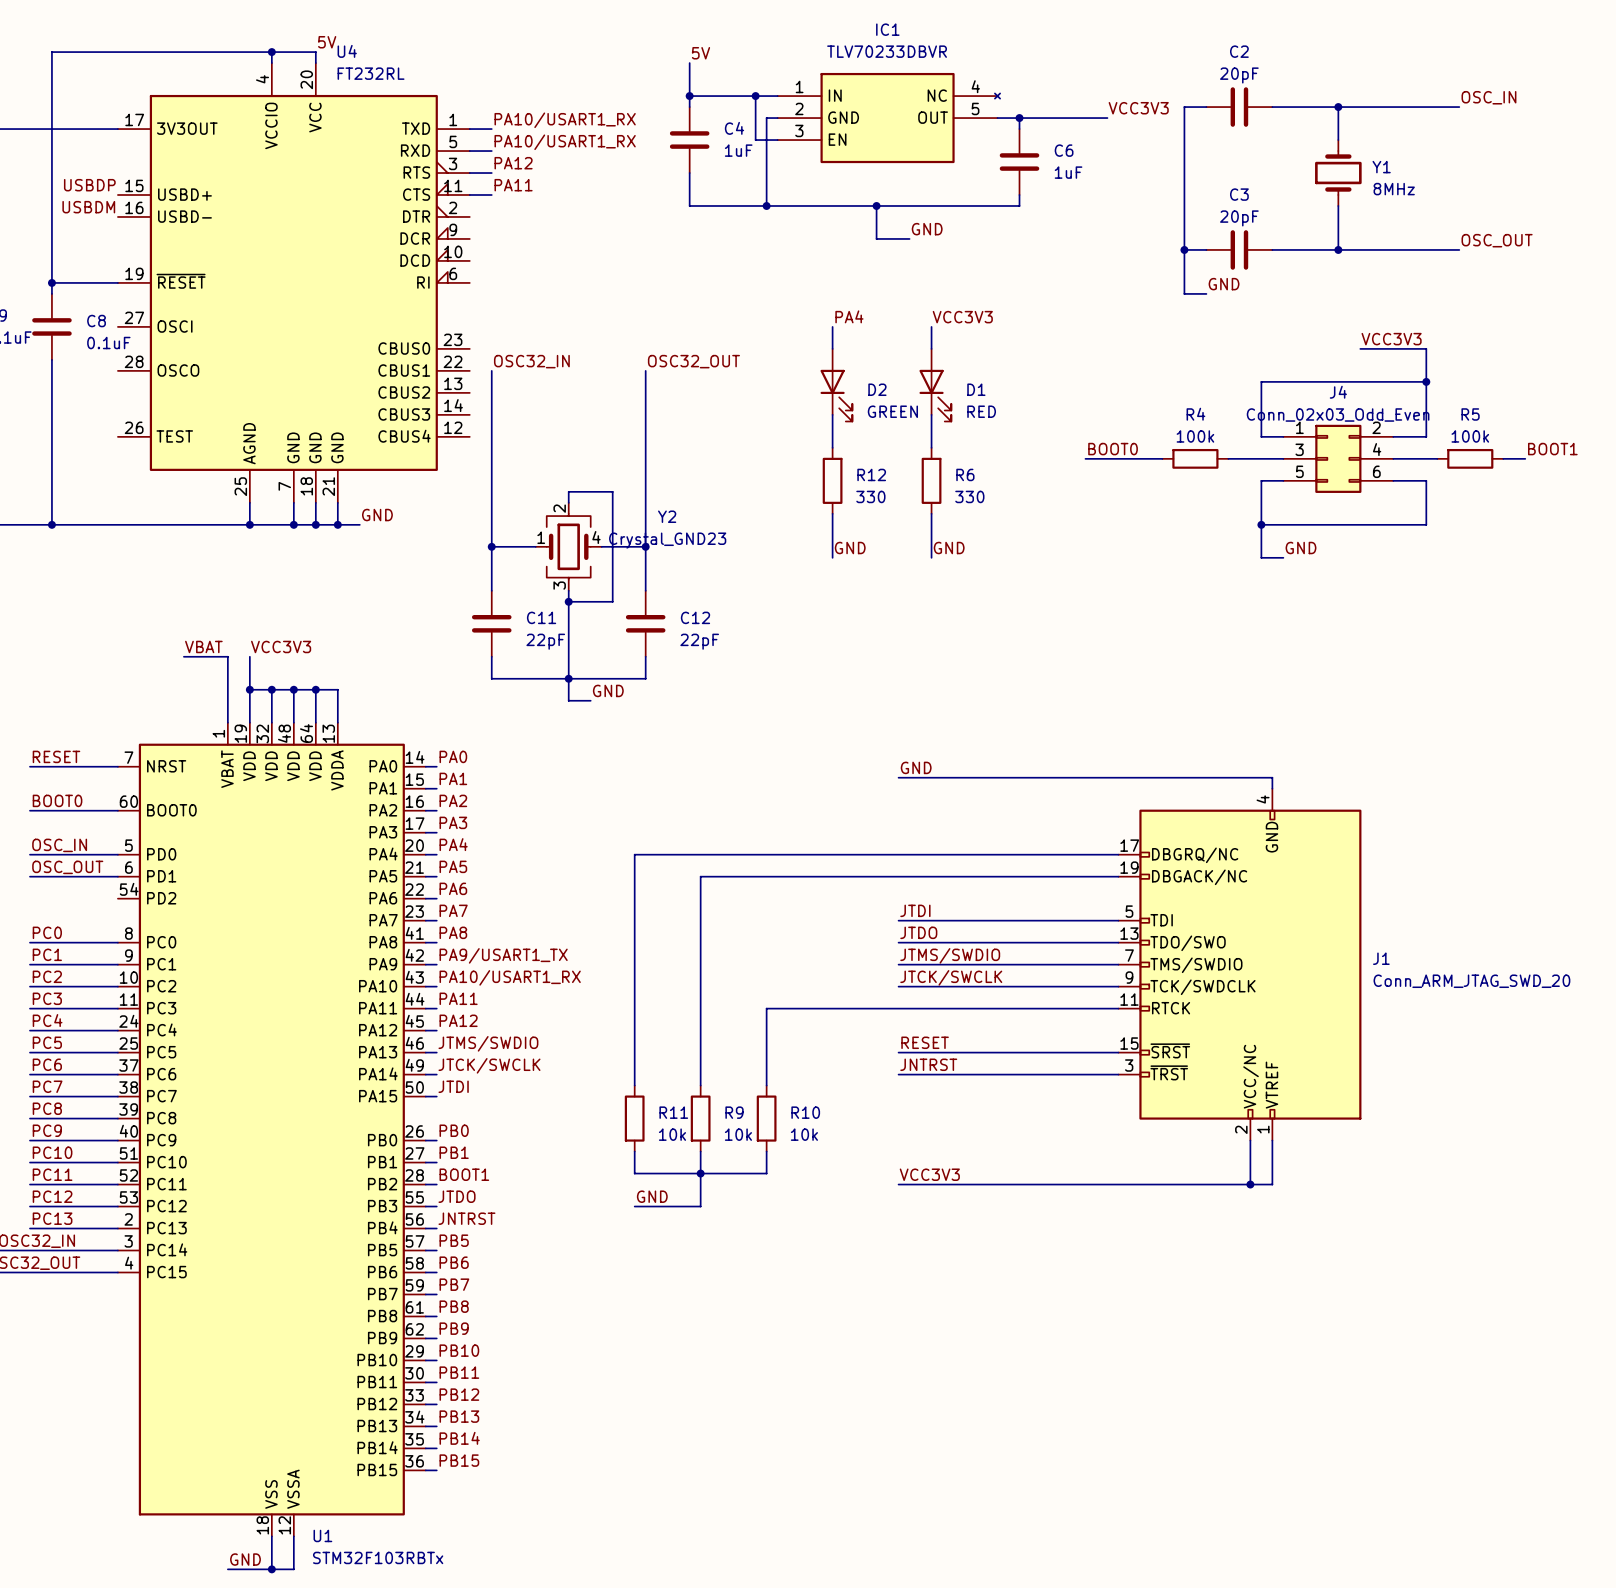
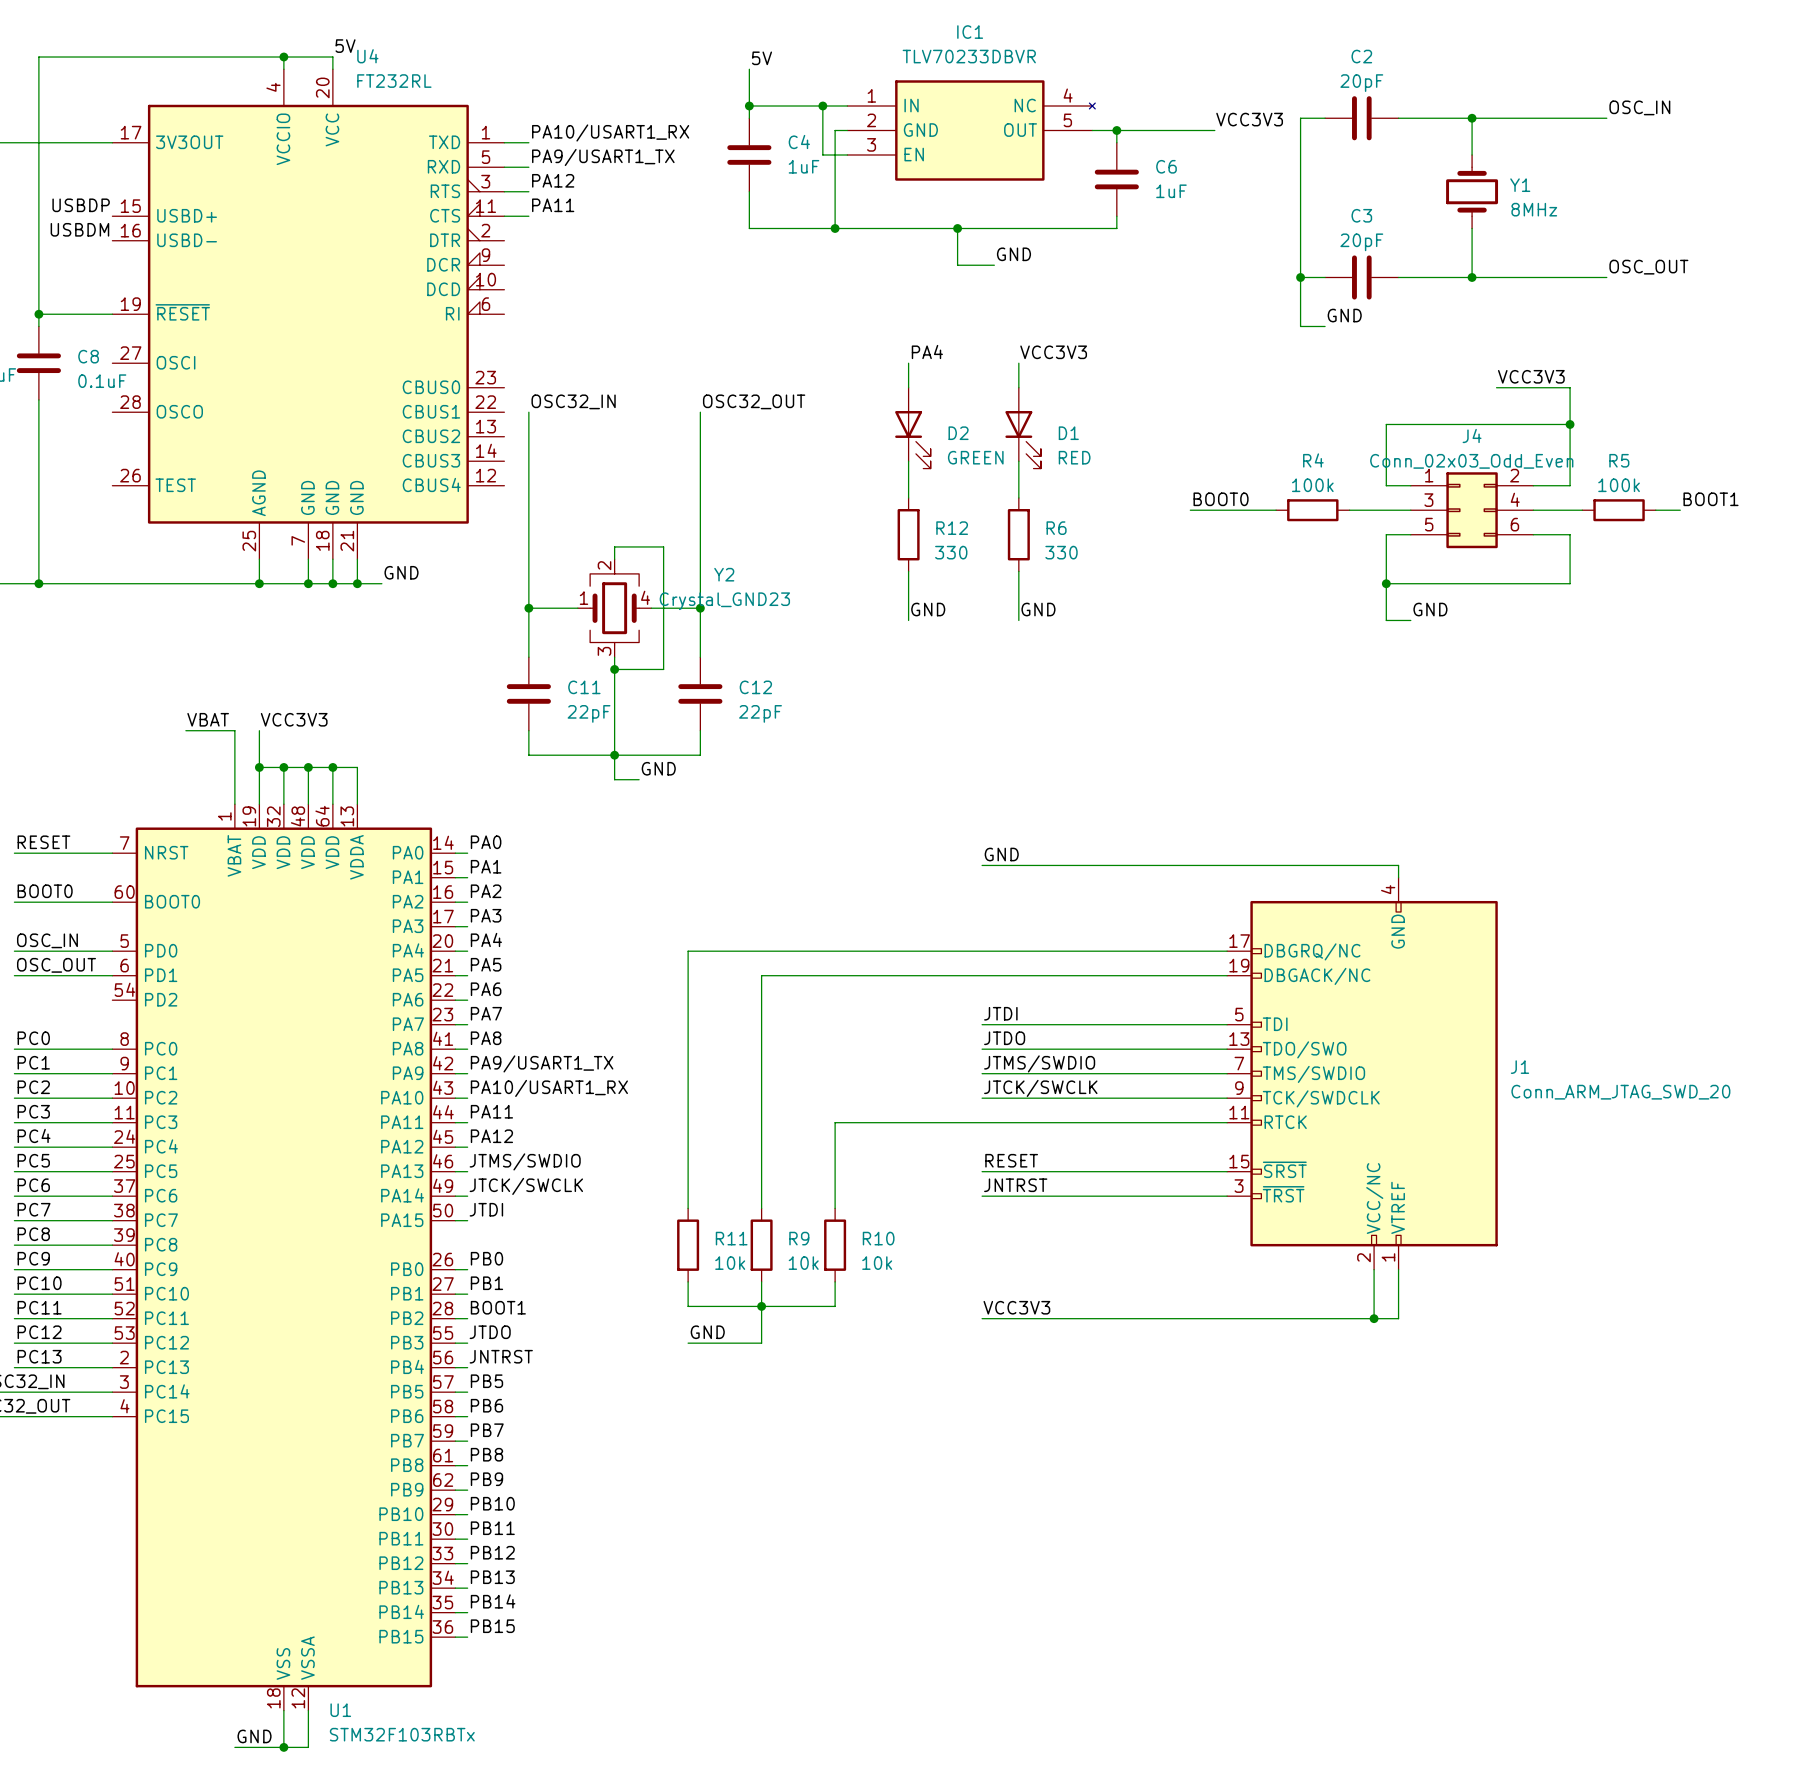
label: PA10/USART1_RX (565, 142) -> PA9/USART1_TX (603, 157)

